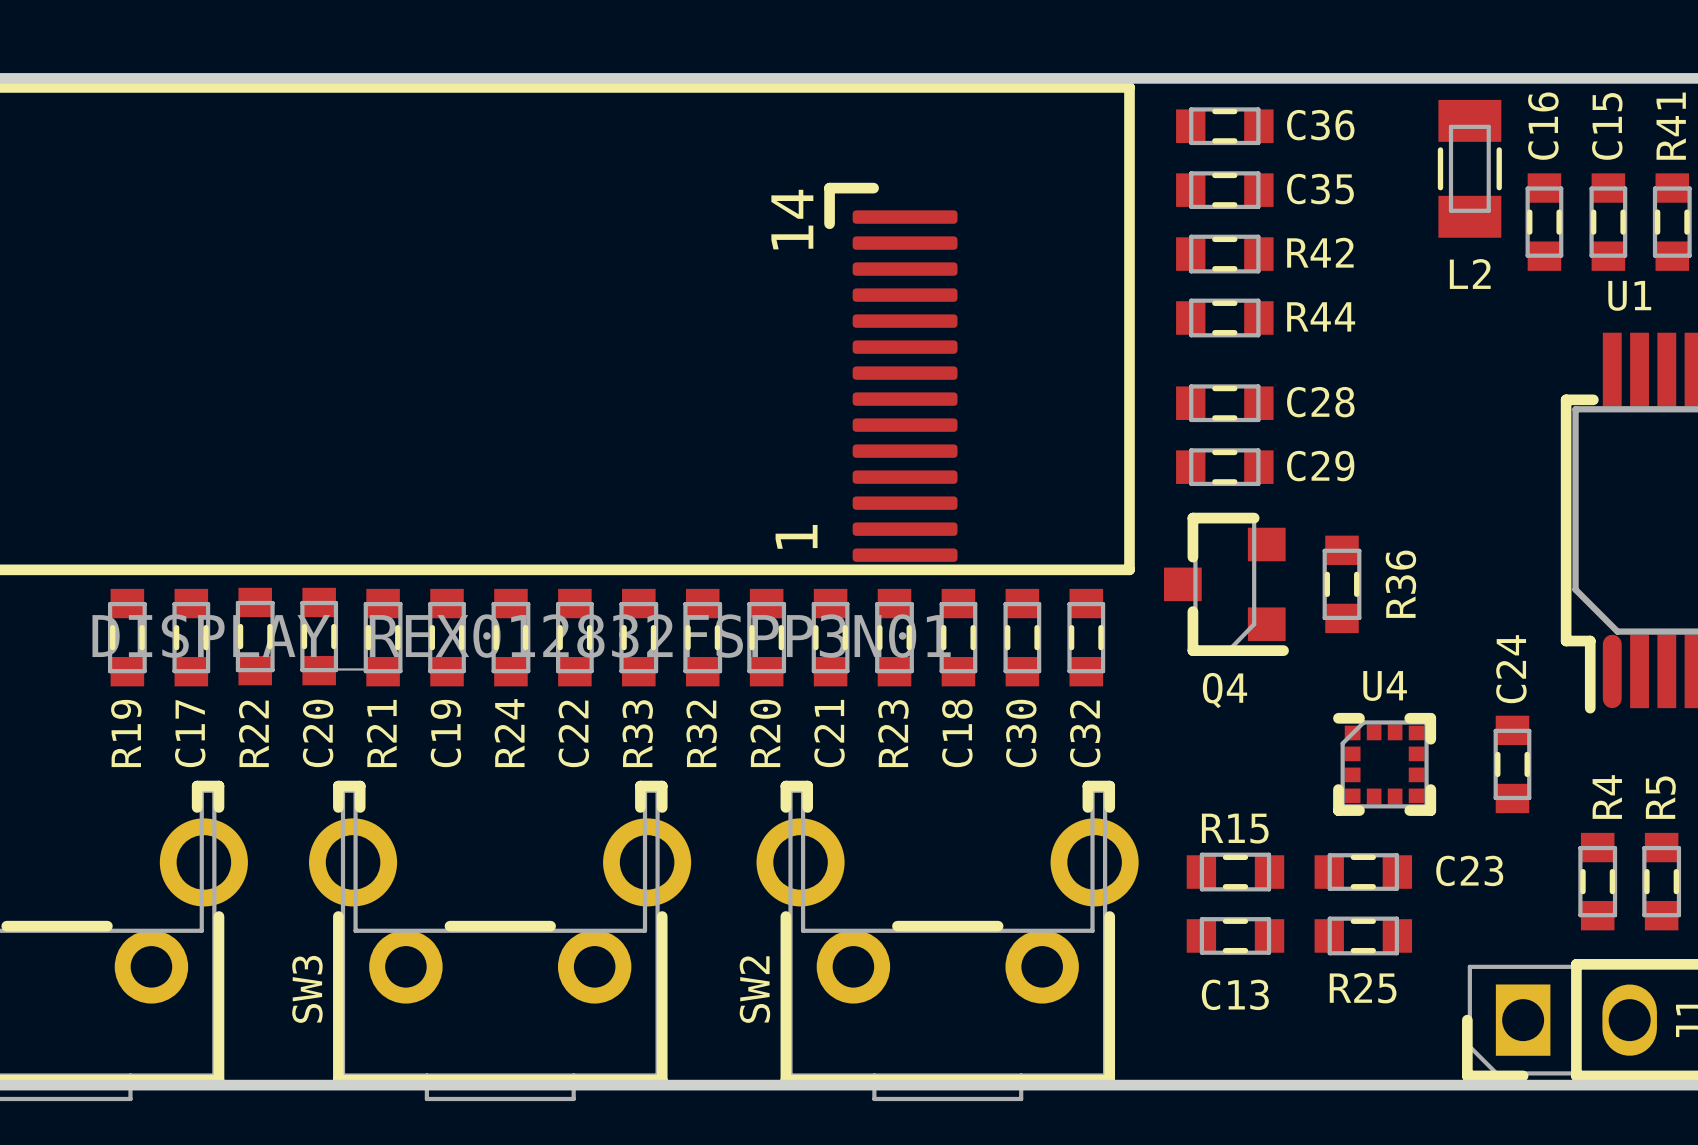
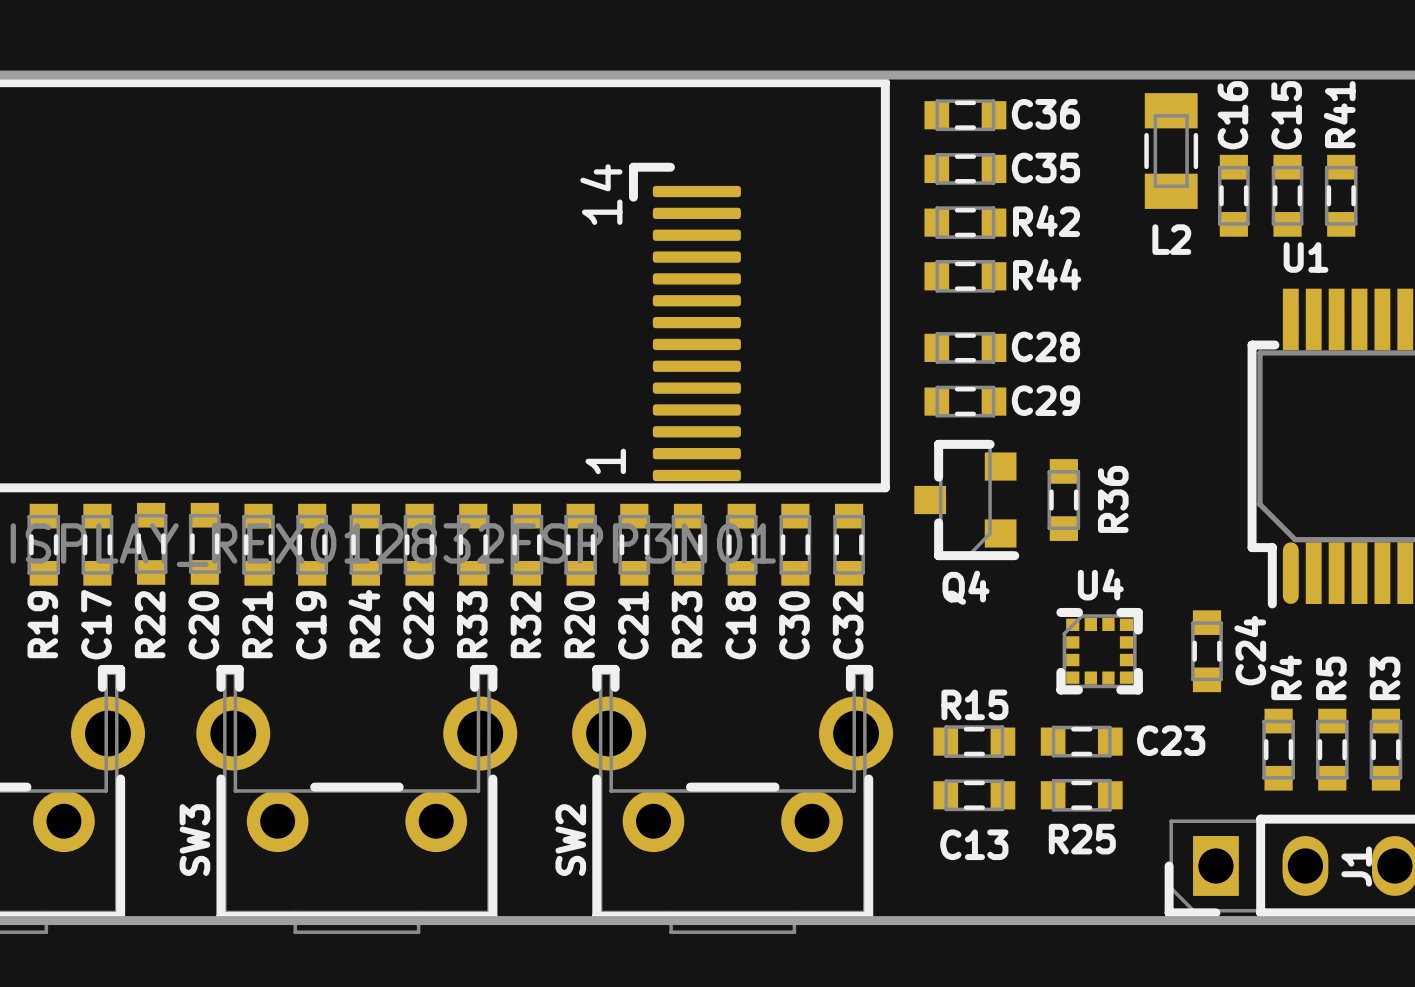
C24 name position: C24 (1511, 669) -> C24 (1250, 650)

